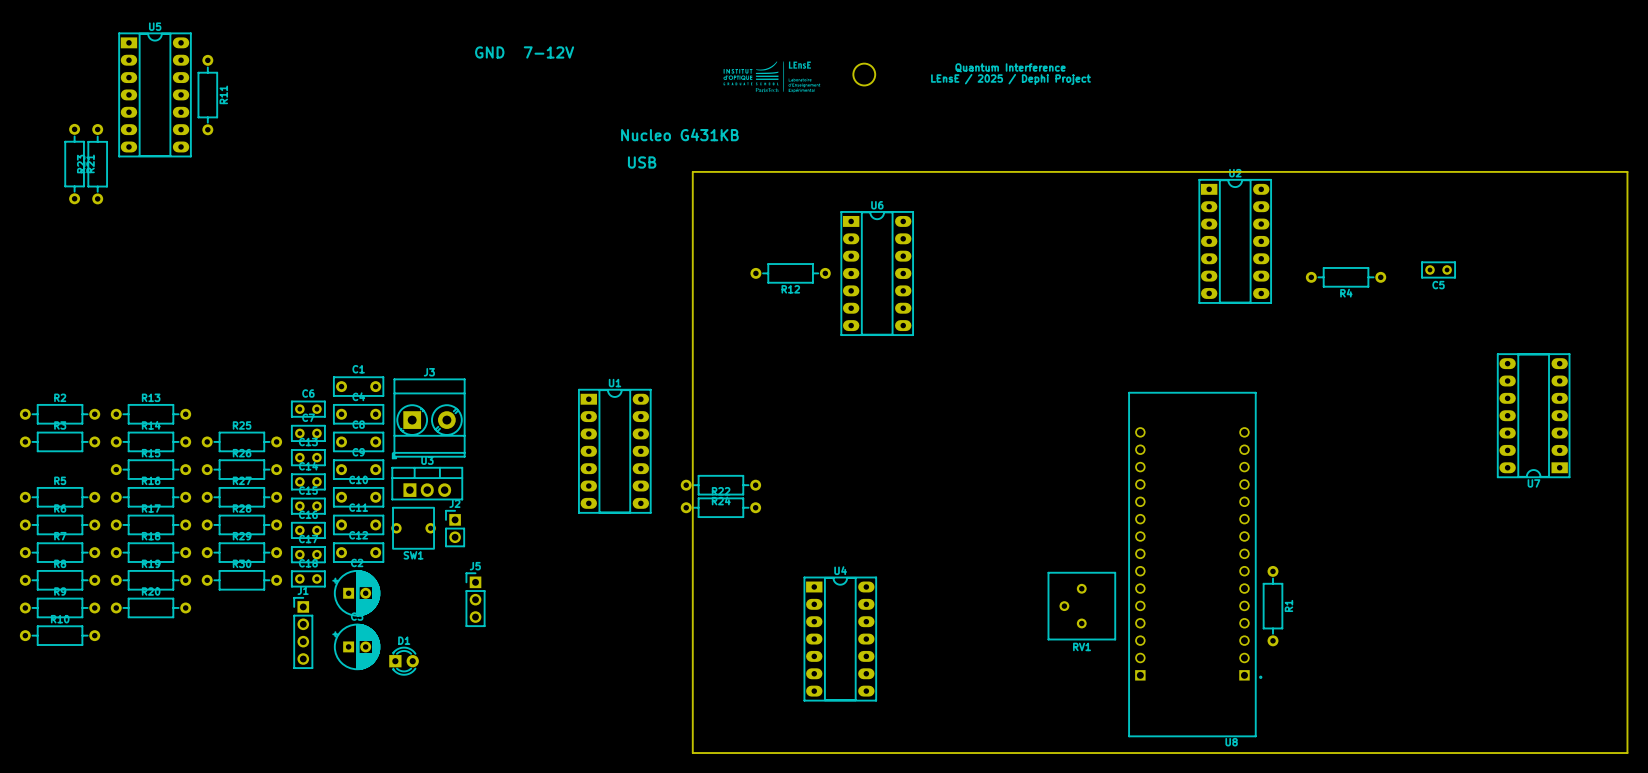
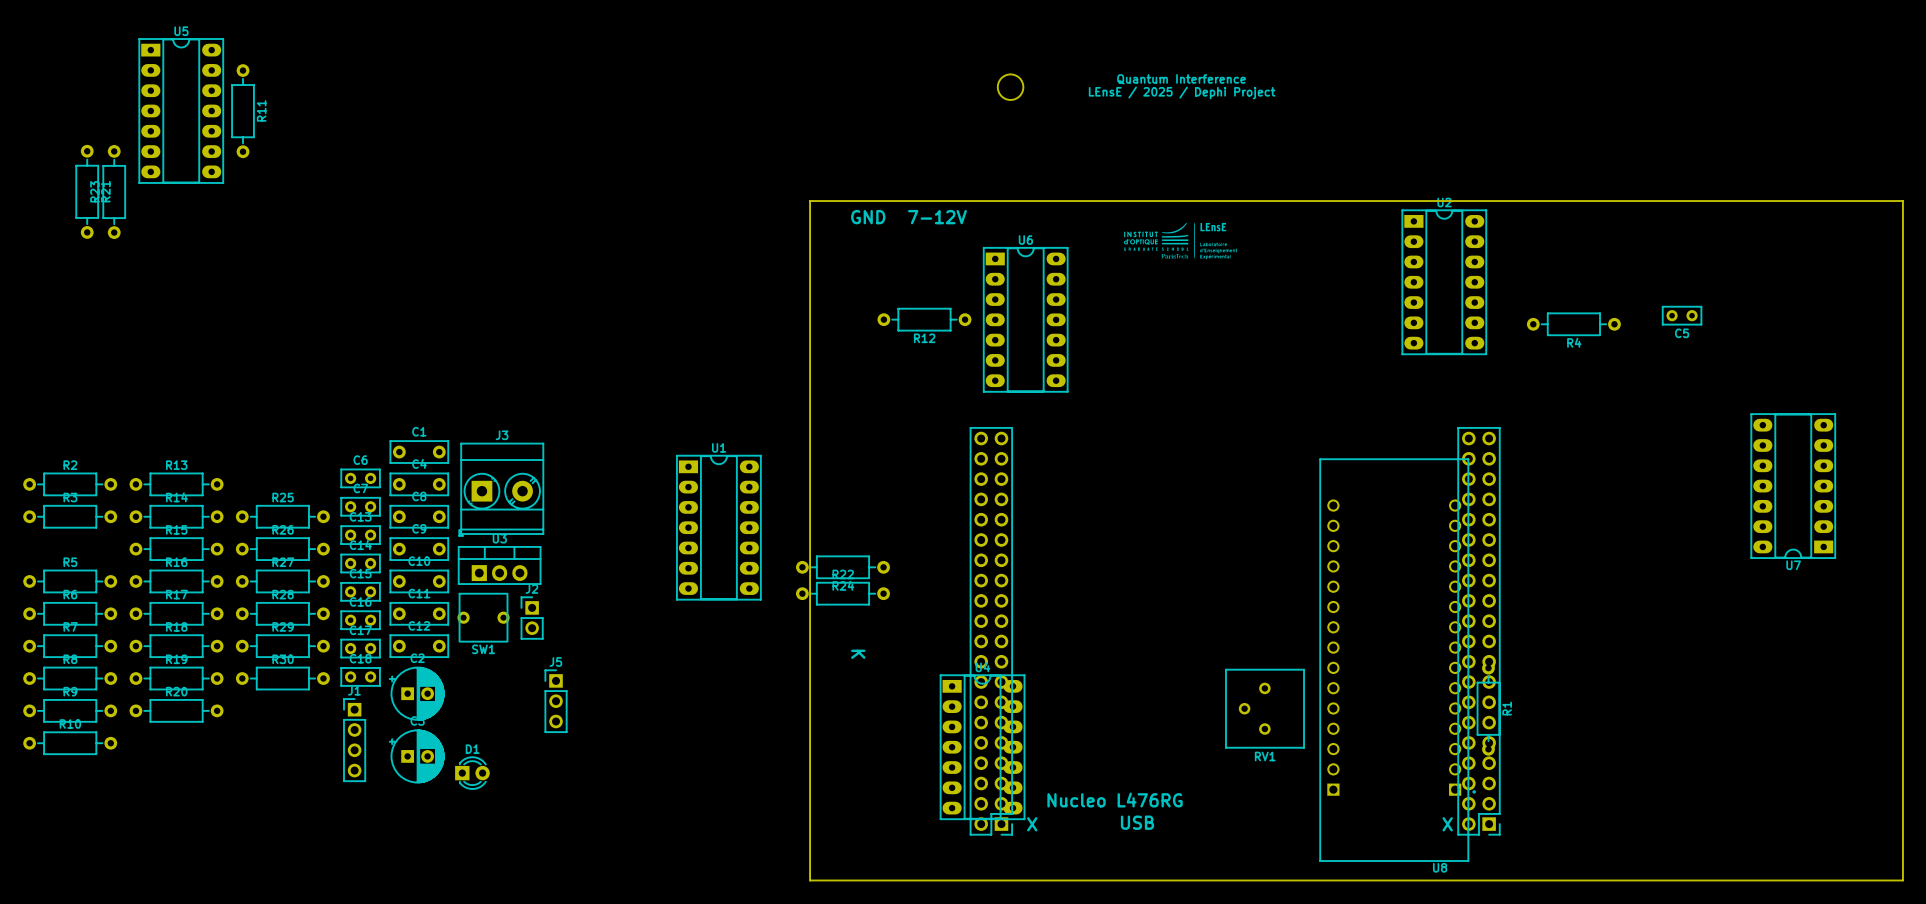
text: GND (489, 52) -> none
text: 7-12V (548, 52) -> none
drawing: [723, 61, 821, 93] -> none
text: Nucleo G431KB (679, 134) -> none
text: USB (642, 162) -> none
text: none -> GND (868, 217)
text: none -> 7-12V (937, 217)
drawing: none -> [1123, 222, 1238, 260]
part: none -> (991, 631)
part: none -> (1478, 631)
text: none -> K (858, 654)
text: none -> Nucleo L476RG (1115, 800)
text: none -> USB (1137, 822)
text: none -> X (1032, 824)
text: none -> X (1447, 824)

